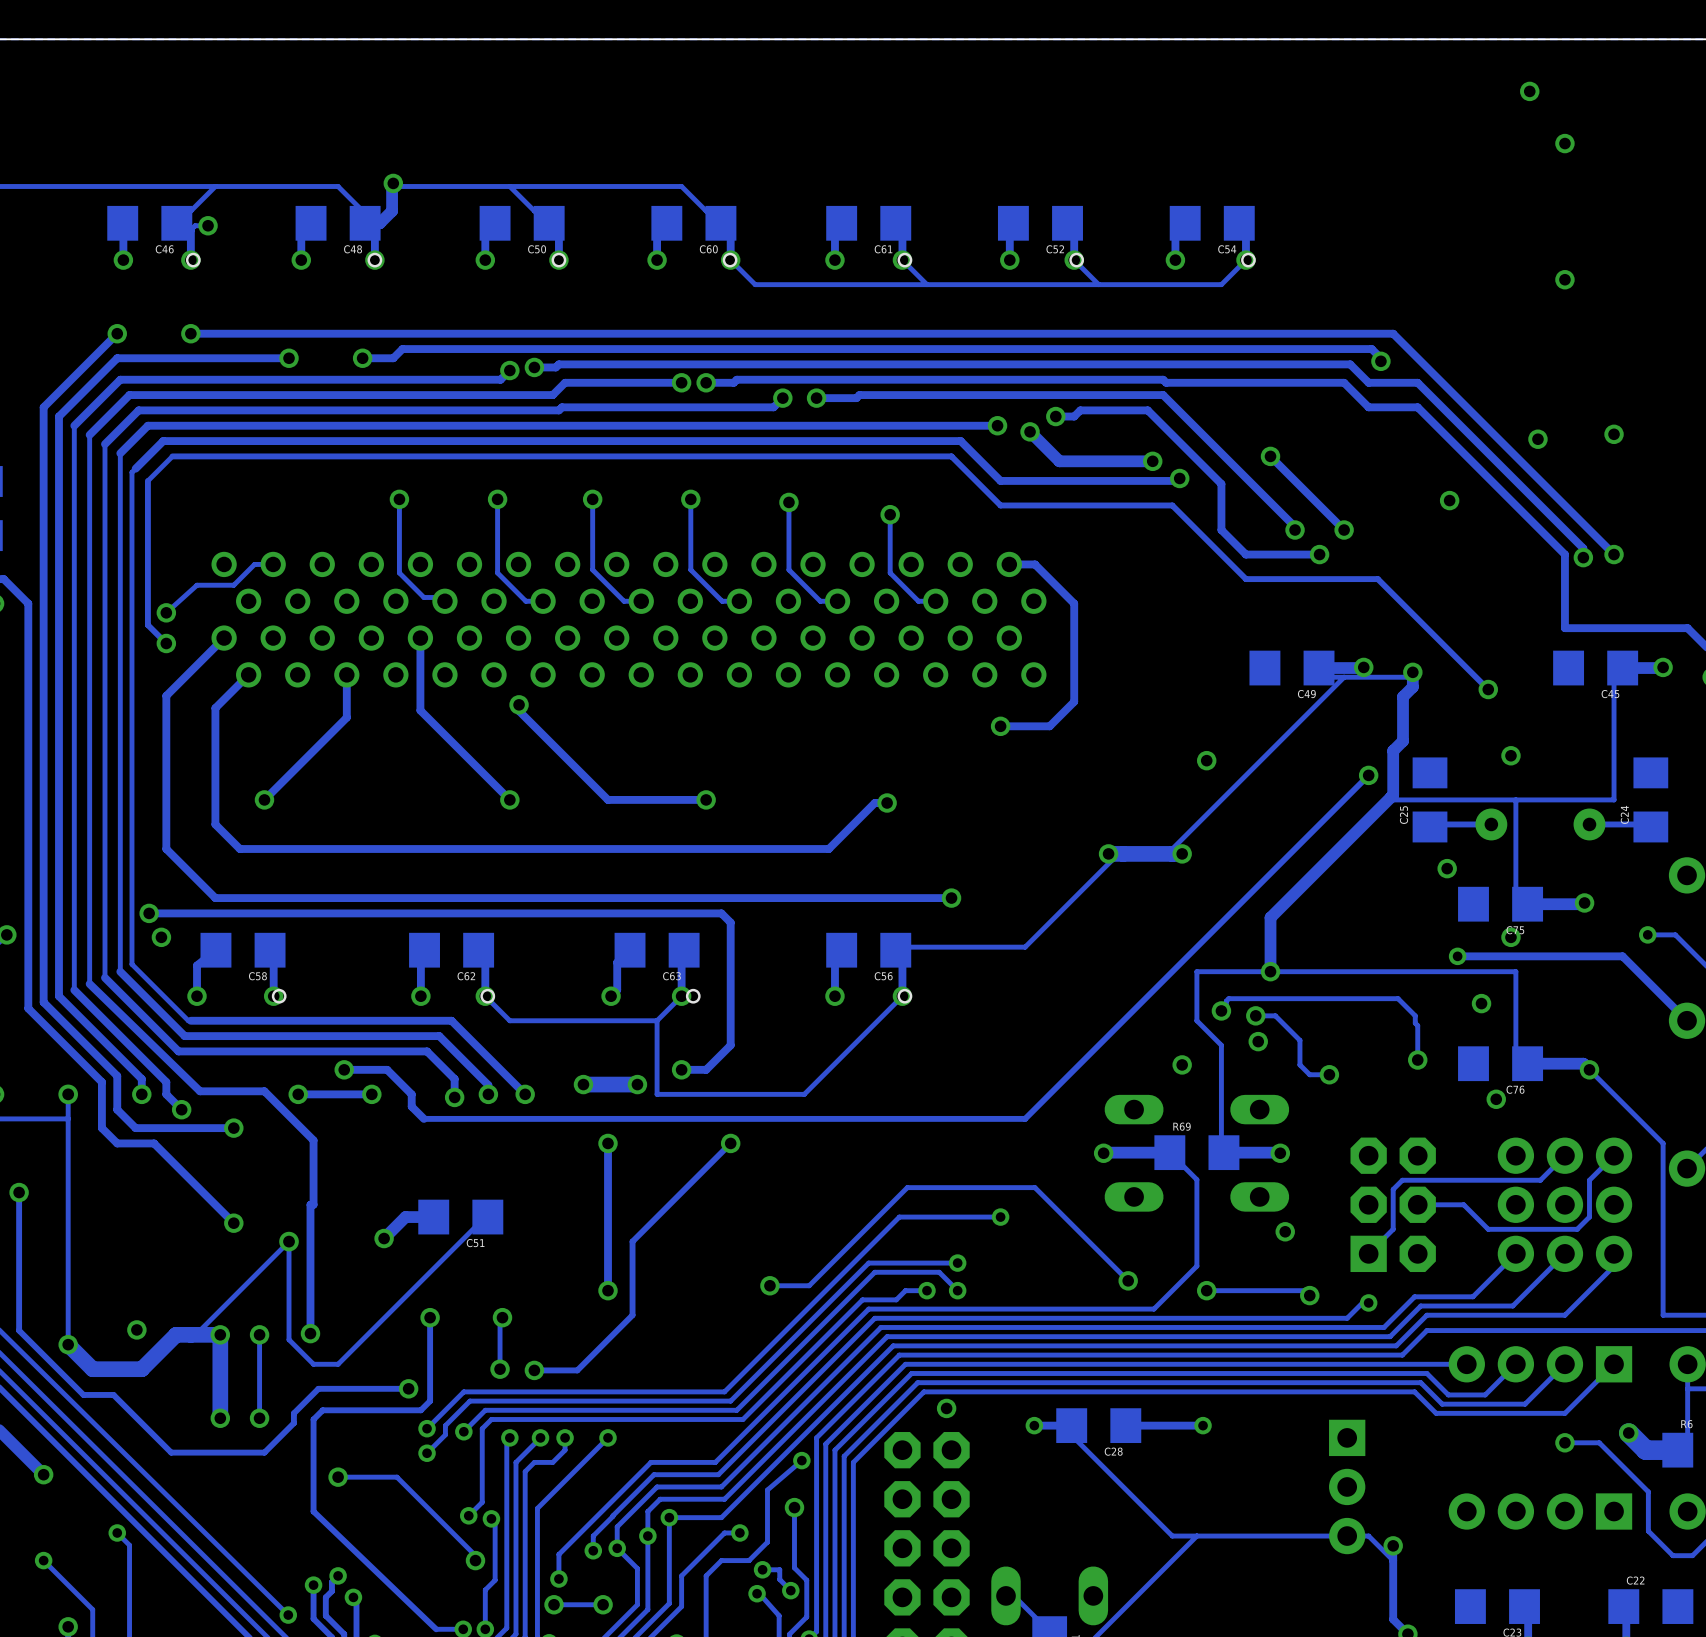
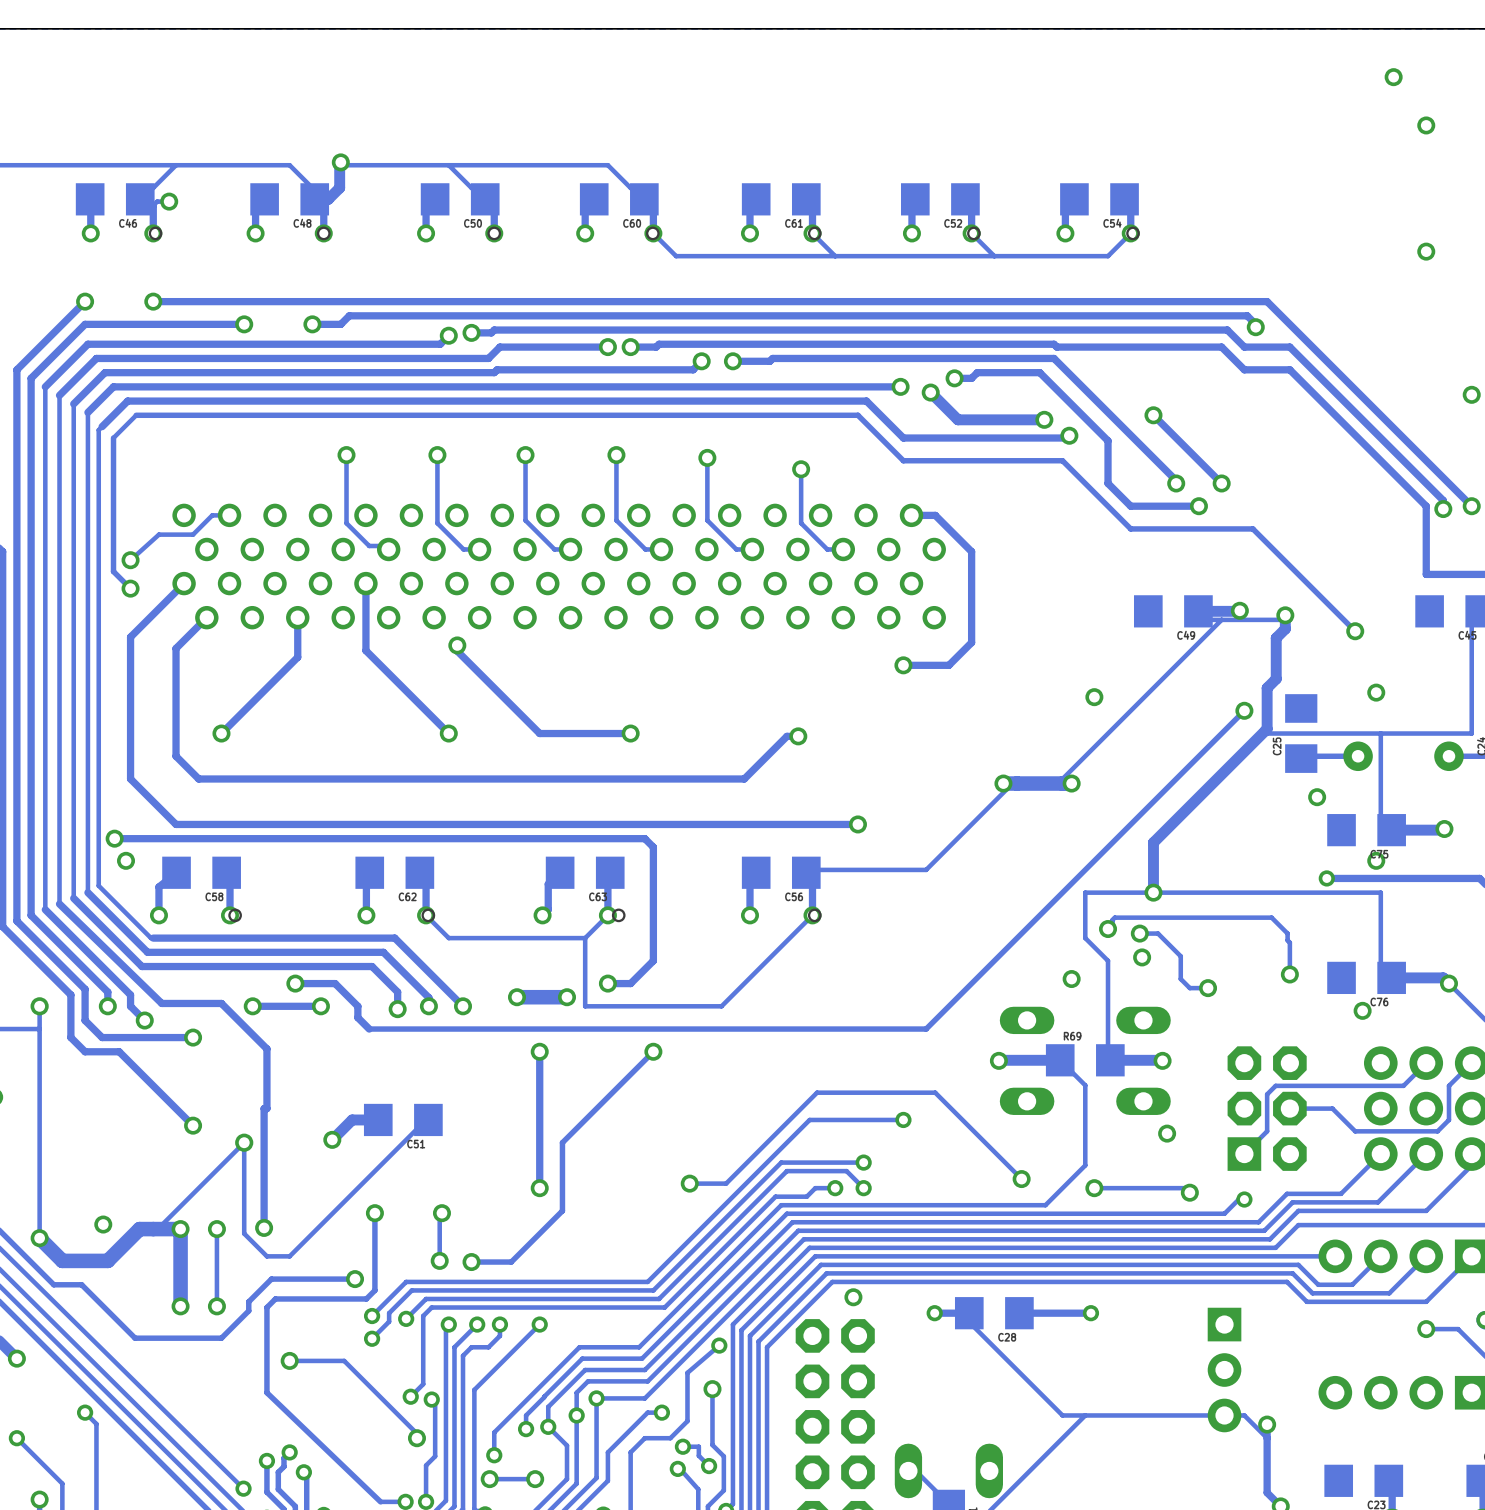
via: (1537, 439) -> none
via: (1449, 500) -> none
via: (1481, 1003) -> none

